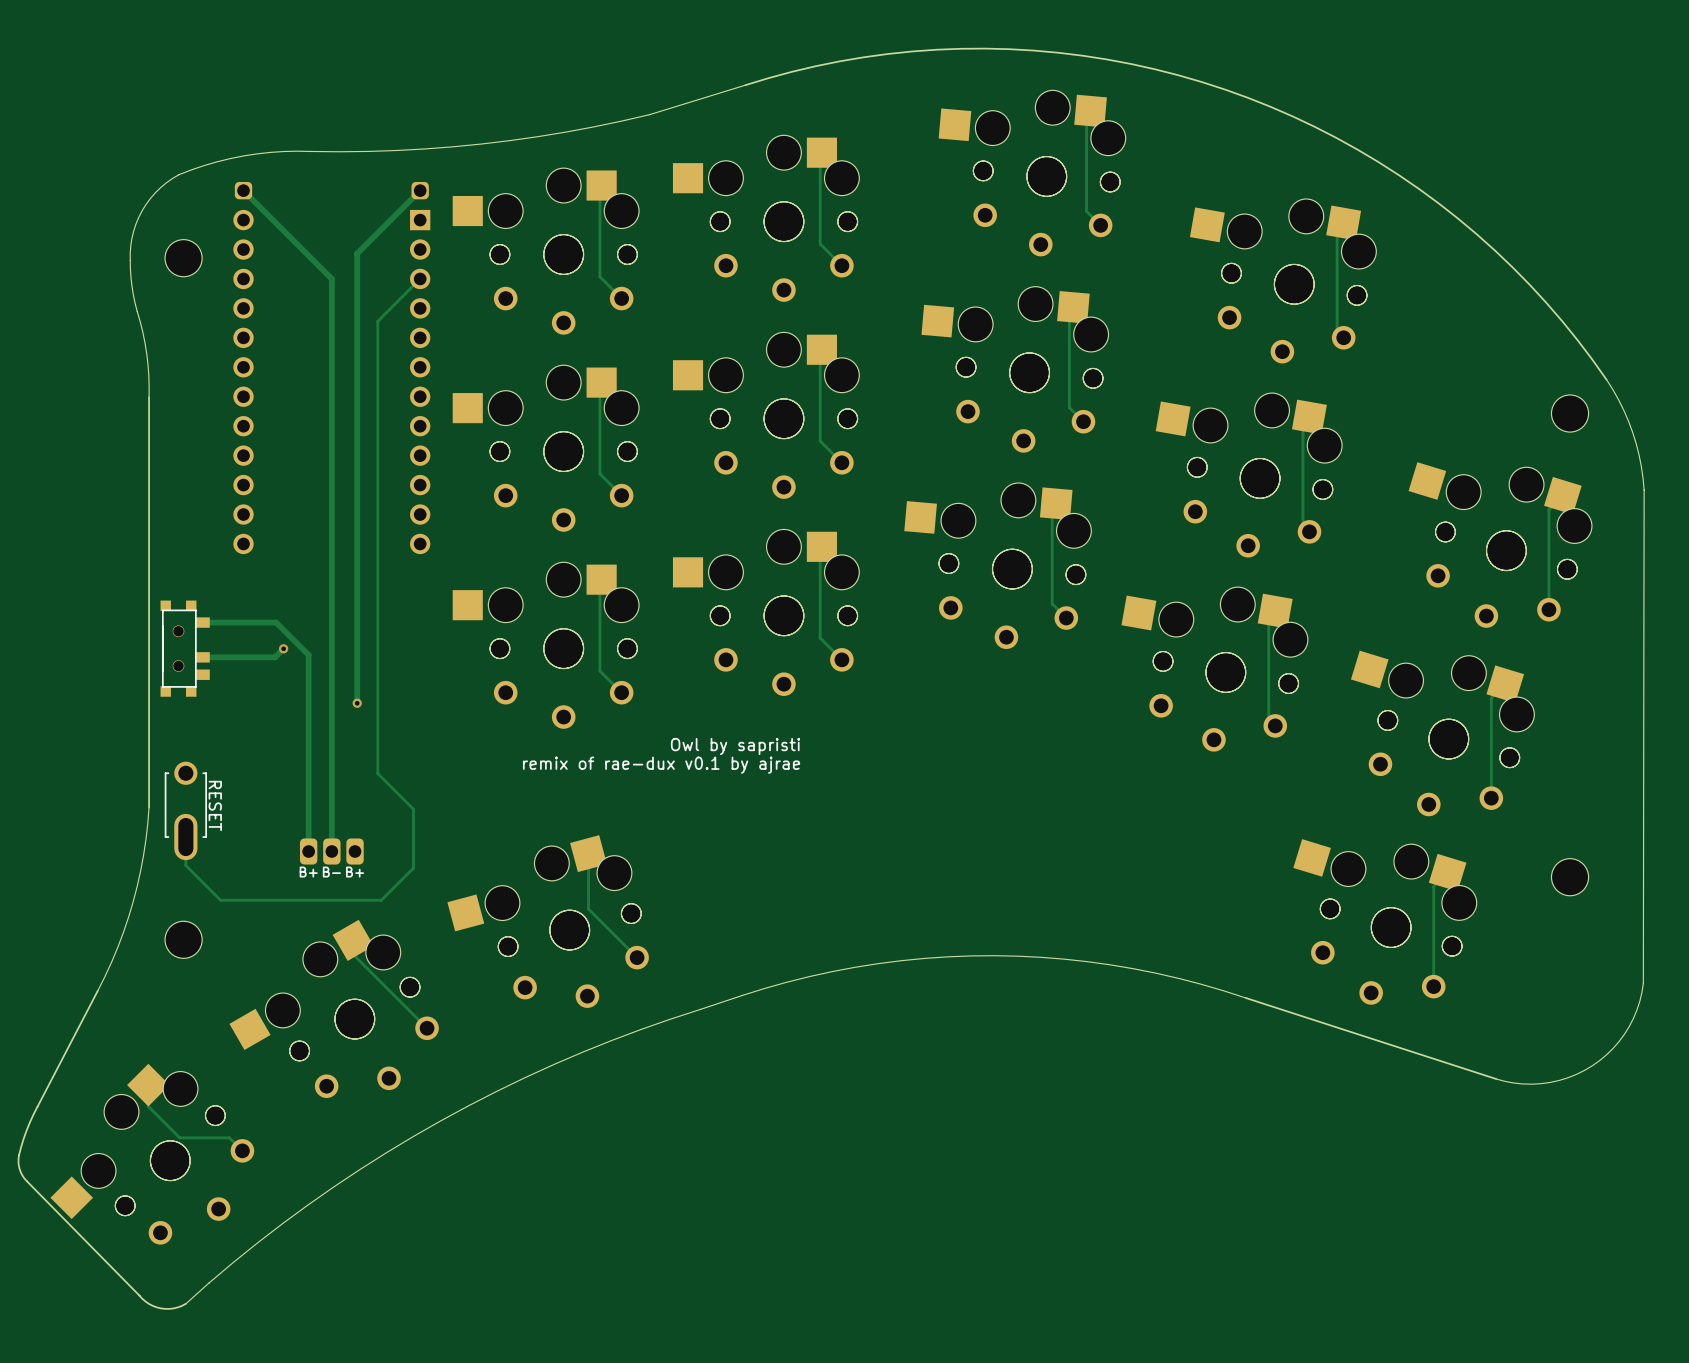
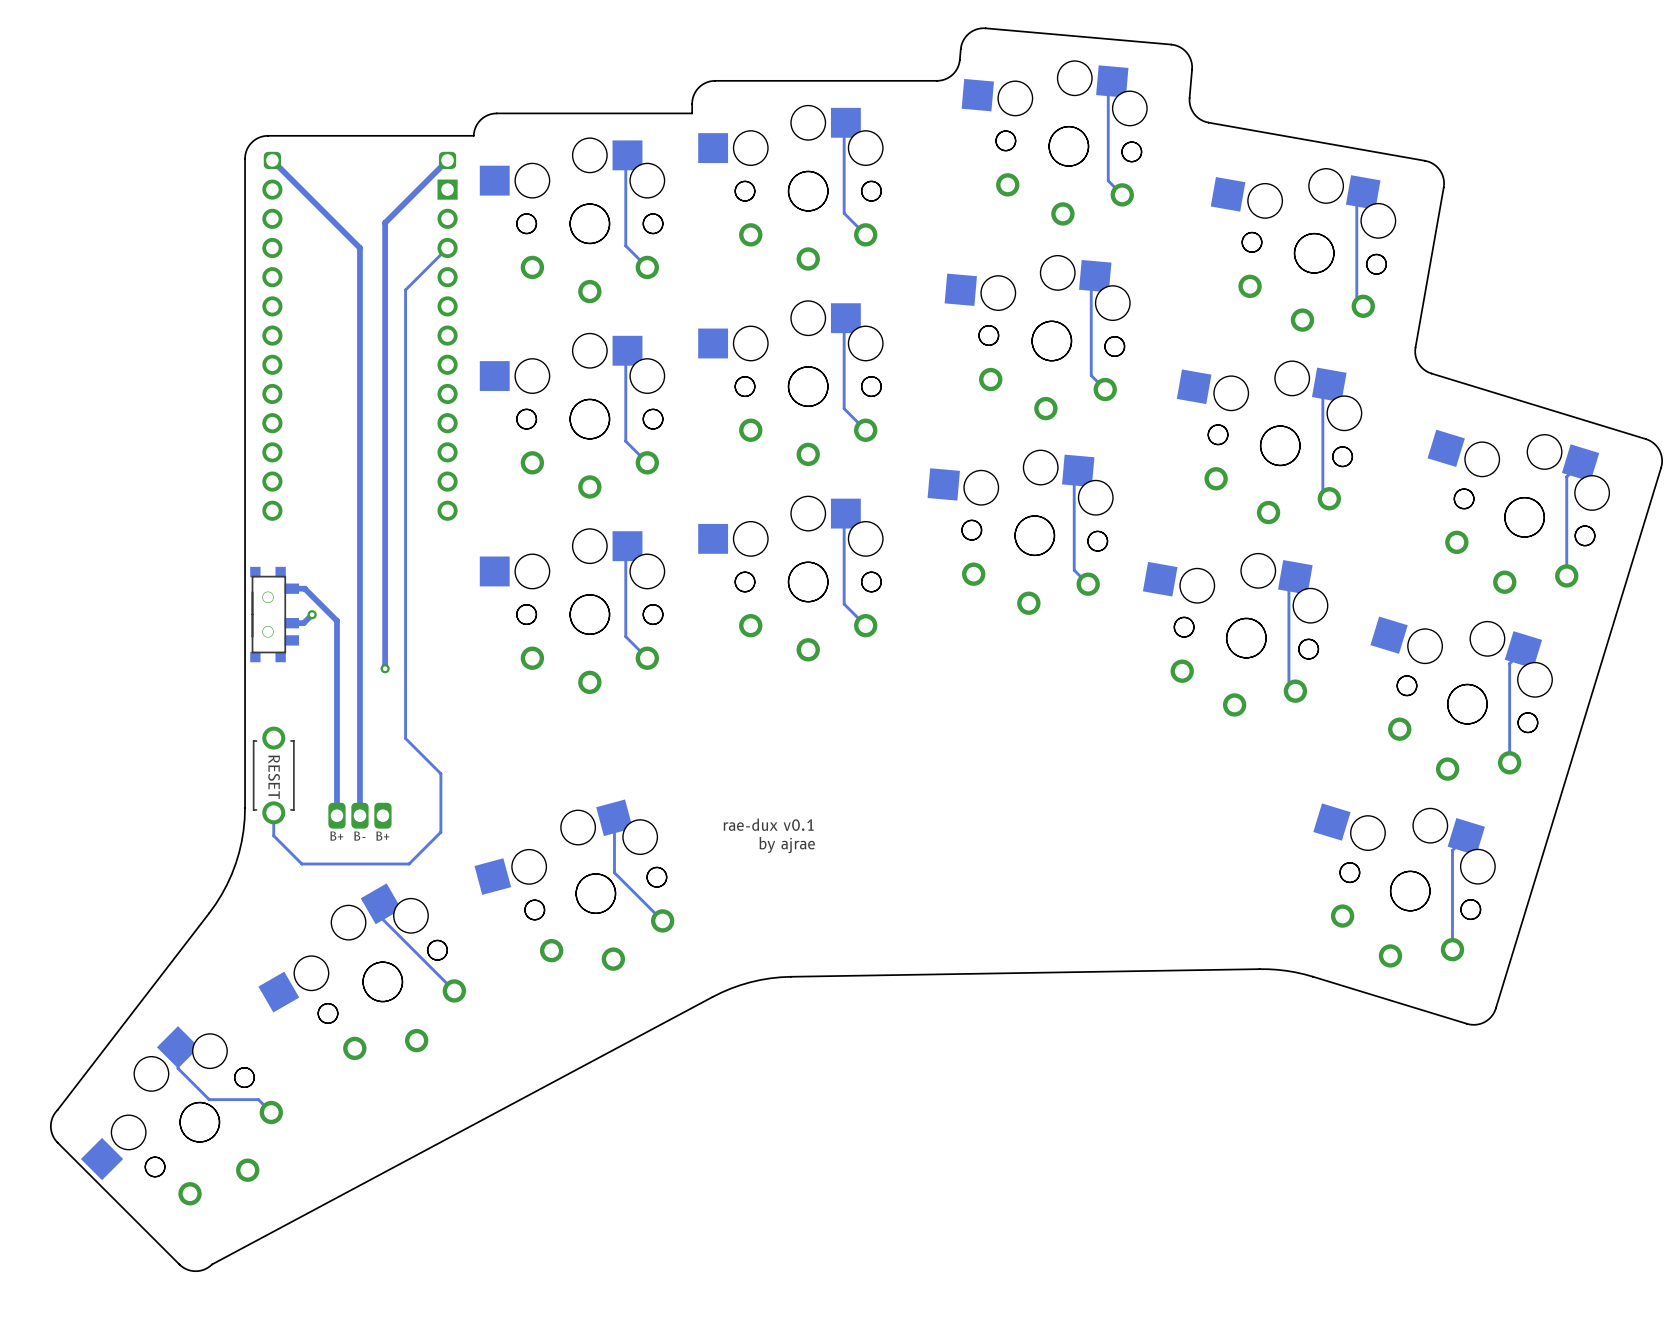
board edge: (745, 85) (649, 114) (537, 136) (424, 148) (283, 151) (230, 158) (191, 169) (172, 178) (150, 198) (138, 217) (131, 238) (130, 260) (133, 294) (146, 353) (149, 386) (149, 807) (145, 839) (133, 901) (117, 947) (97, 990) (33, 1114) (23, 1138) (18, 1162) (20, 1172) (26, 1181) (142, 1298) (153, 1305) (169, 1308) (185, 1303) (257, 1242) (333, 1187) (413, 1136) (496, 1091) (553, 1064) (640, 1029) (764, 988) (832, 971) (901, 960) (971, 955) (1040, 957) (1110, 964) (1201, 984) (1496, 1078) (1522, 1083) (1559, 1080) (1584, 1070) (1613, 1048) (1633, 1018) (1643, 983) (1643, 478) (1632, 432) (1612, 389) (1577, 340) (1529, 284) (1495, 250) (1458, 218) (1419, 189) (1378, 162) (1314, 126) (1270, 106) (1224, 89) (1178, 75) (1130, 63) (1082, 55) (1009, 49) (961, 48) (912, 51) (863, 57) (815, 66) (745, 85) -> (985, 28) (975, 29) (967, 35) (961, 44) (959, 62) (956, 70) (950, 76) (939, 80) (712, 80) (702, 84) (695, 91) (692, 101) (692, 113) (493, 113) (485, 116) (478, 122) (473, 135) (268, 135) (255, 139) (248, 146) (245, 158) (245, 808) (241, 841) (231, 874) (215, 904) (55, 1112) (50, 1126) (52, 1135) (57, 1142) (183, 1267) (195, 1271) (205, 1268) (712, 997) (730, 988) (760, 979) (790, 976) (1268, 969) (1304, 974) (1469, 1024) (1484, 1022) (1493, 1013) (1661, 467) (1662, 458) (1659, 450) (1653, 443) (1645, 439) (1431, 373) (1420, 365) (1416, 358) (1415, 347) (1444, 184) (1441, 172) (1433, 164) (1425, 160) (1203, 120) (1194, 113) (1189, 103) (1191, 60) (1184, 50) (1177, 45) (985, 28)
part: (183, 258) -> none
part: (1570, 413) -> none
track: (263, 622) (202, 622) -> none
part position: (185, 648) -> (274, 614)
track: (263, 657) (202, 657) -> none
text: Owl by sapristi (735, 746) -> none
text: remix of rae-dux v0.1 by ajrae (661, 765) -> none
part: (185, 810) -> none
part: none -> (273, 775)
track: (185, 848) (185, 865) (220, 900) (273, 900) -> (273, 812) (273, 835) (301, 864)
text: none -> rae-dux v0.1 (768, 824)
part: (1570, 877) -> none
text: none -> by ajrae (787, 845)
part: (183, 939) -> none

